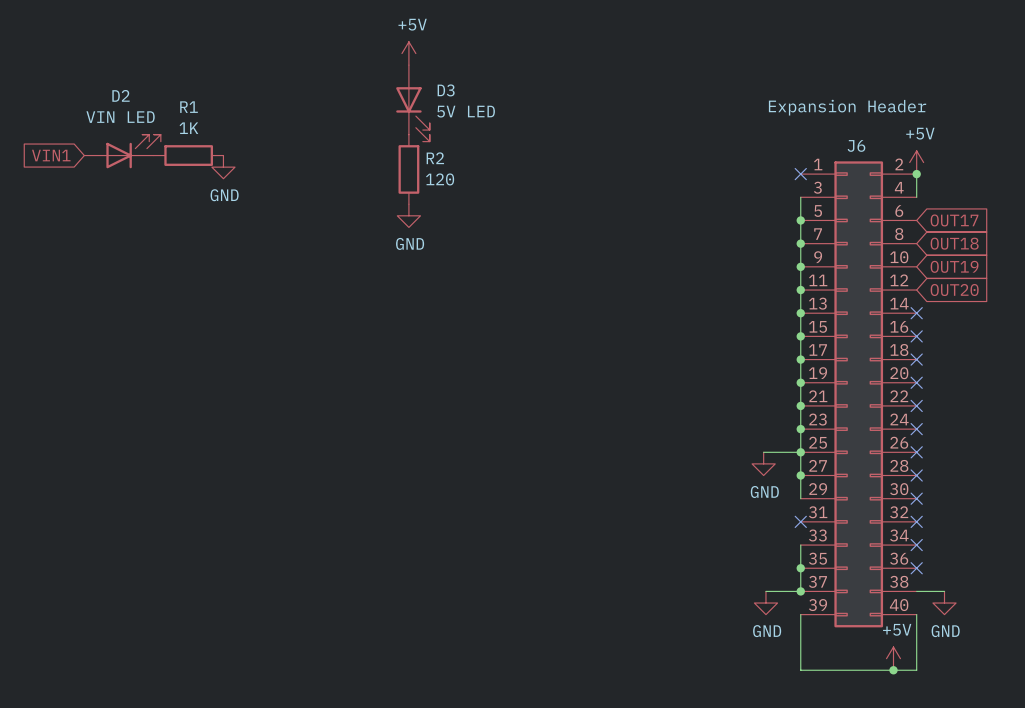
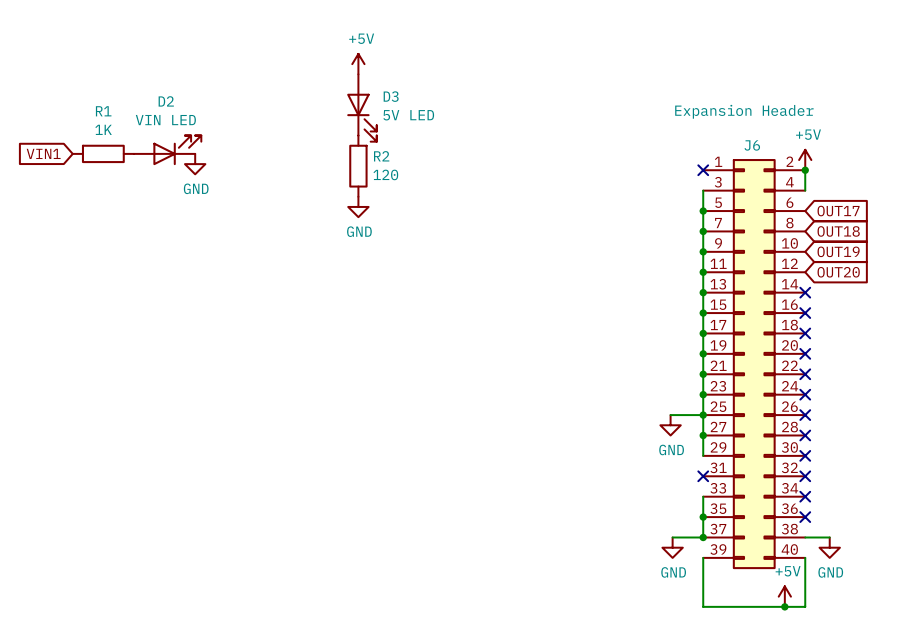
D2 position: (122, 151) -> (167, 150)
R1 position: (188, 155) -> (103, 153)

